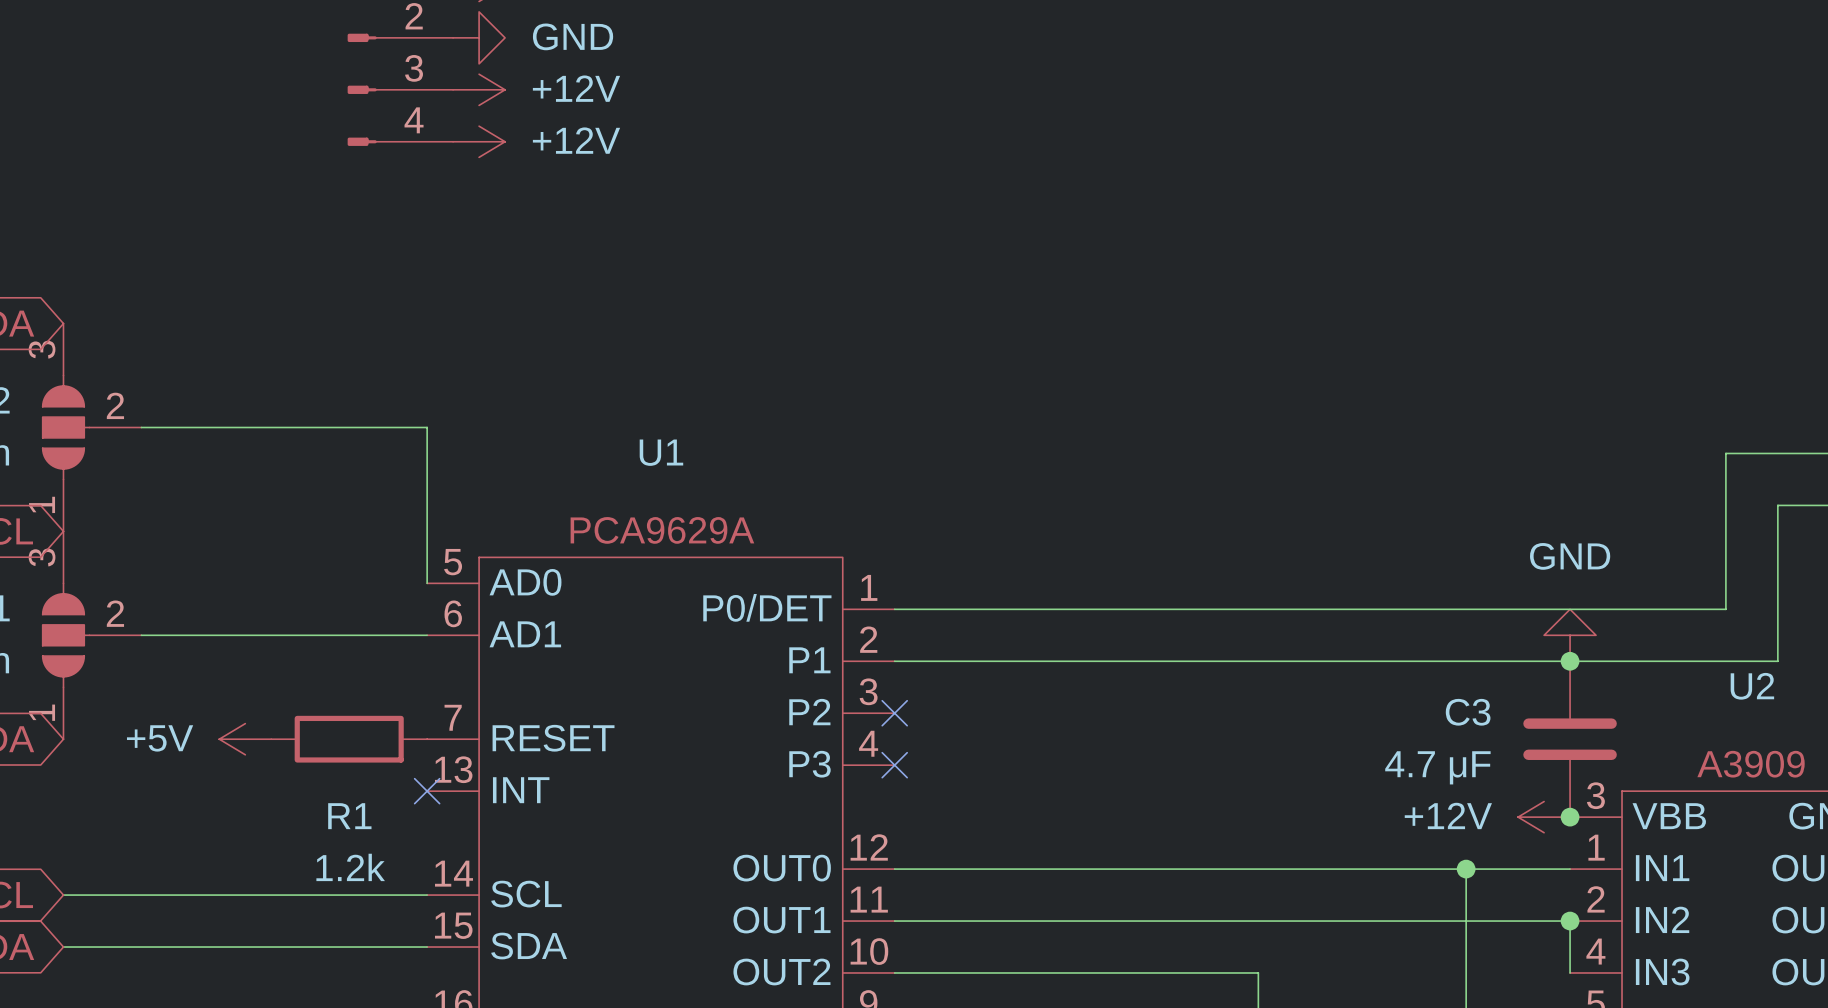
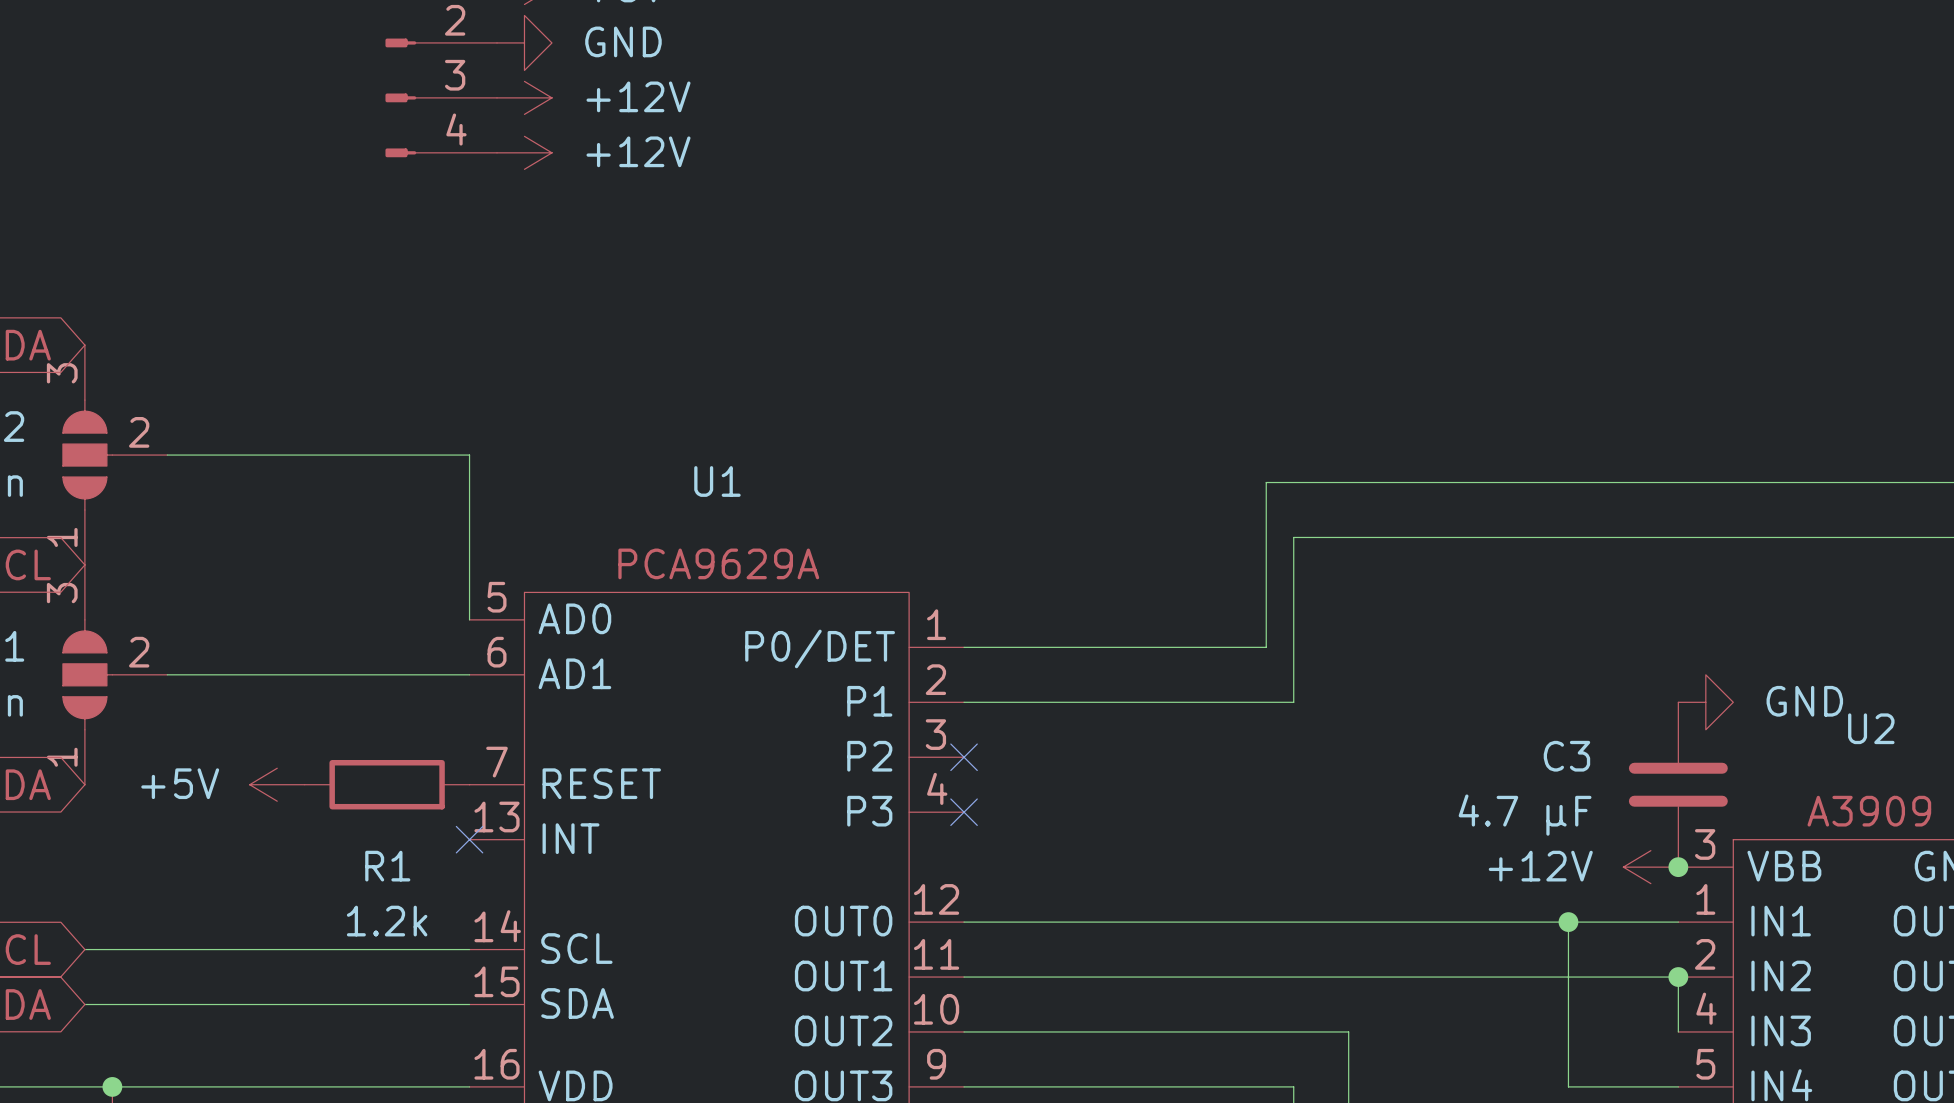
wire: (1725, 453) (1725, 609) (1180, 609) -> (1843, 482) (1266, 482) (1266, 647)
wire: (1777, 505) (1777, 661) (1206, 661) -> (1898, 537) (1293, 537) (1293, 702)
power symbol rotation: 0° (1570, 635) -> 90° clockwise (1705, 702)
power symbol position: GND (1570, 635) -> GND (1705, 702)
junction: (1570, 661) -> none

